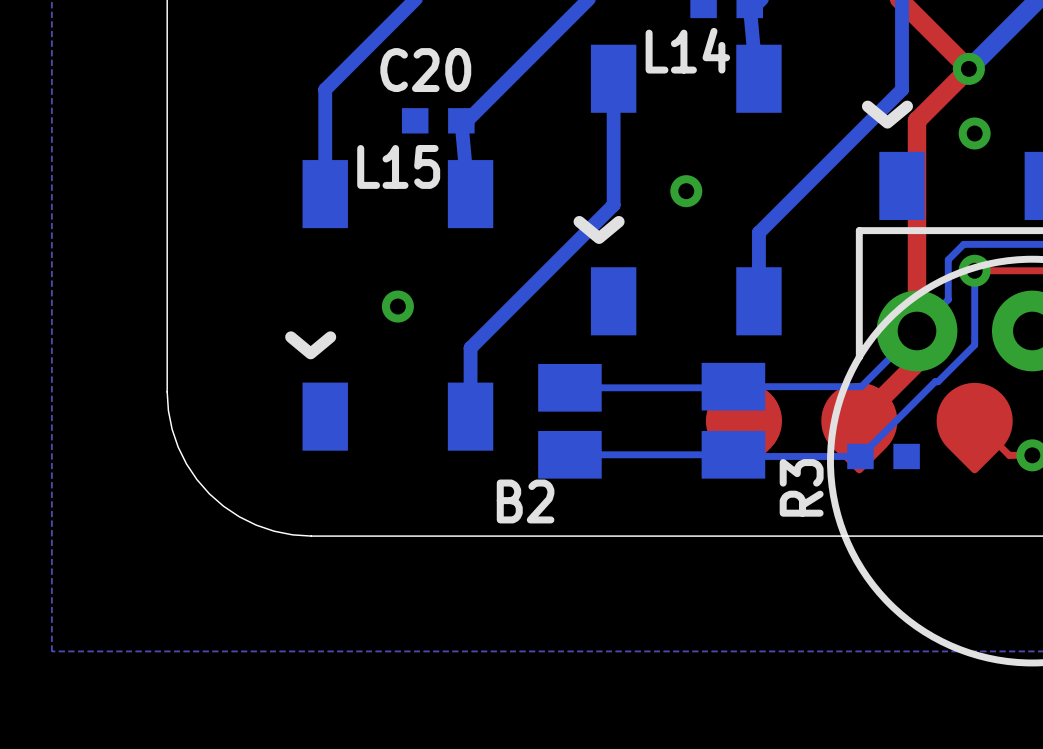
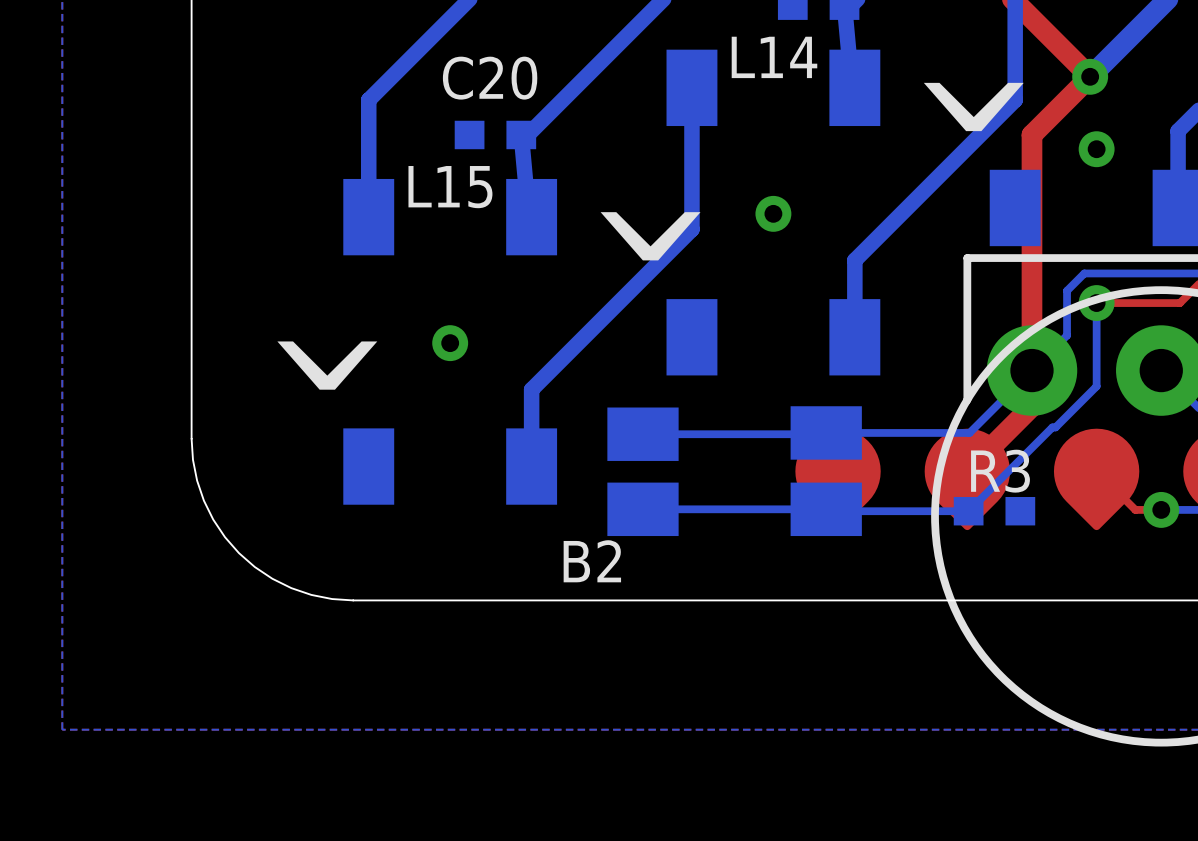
R3 name rotation: 0° (801, 487) -> 90° clockwise (1000, 471)
R3 name position: R3 (801, 487) -> R3 (1000, 471)

